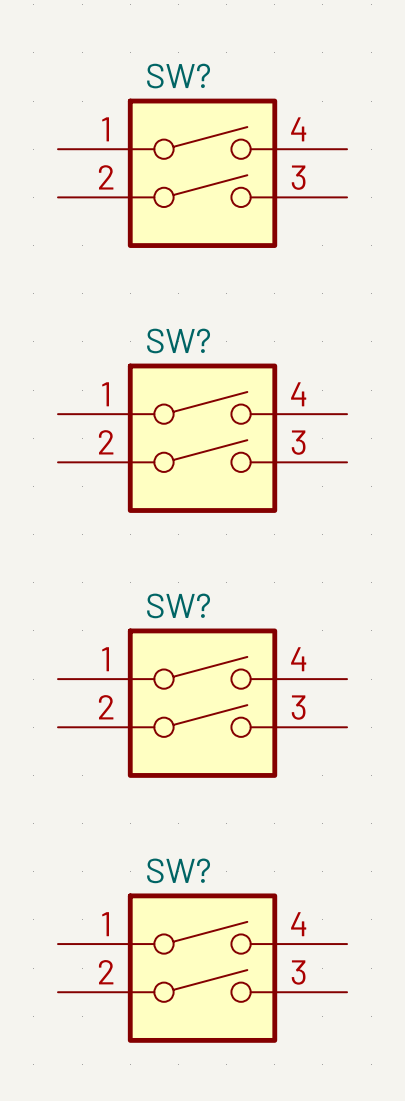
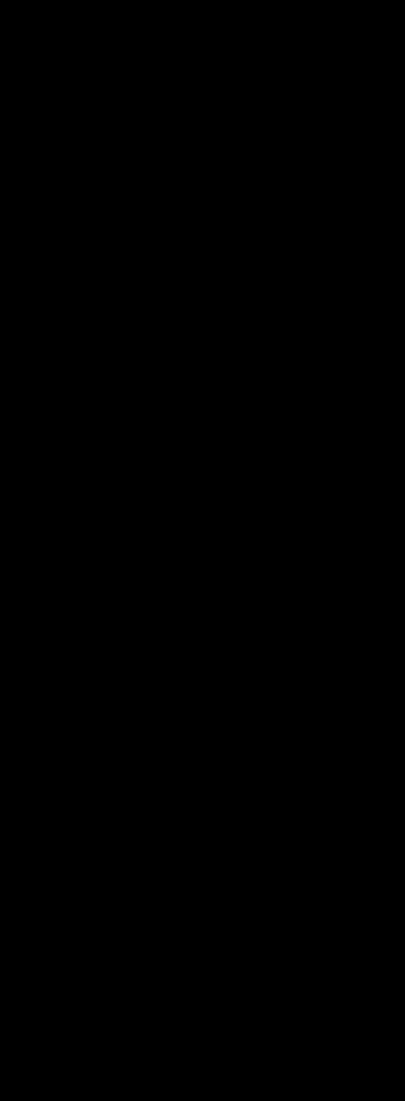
SW?: (202, 173) -> none
SW?: (202, 438) -> none
SW?: (202, 703) -> none
SW?: (202, 968) -> none

